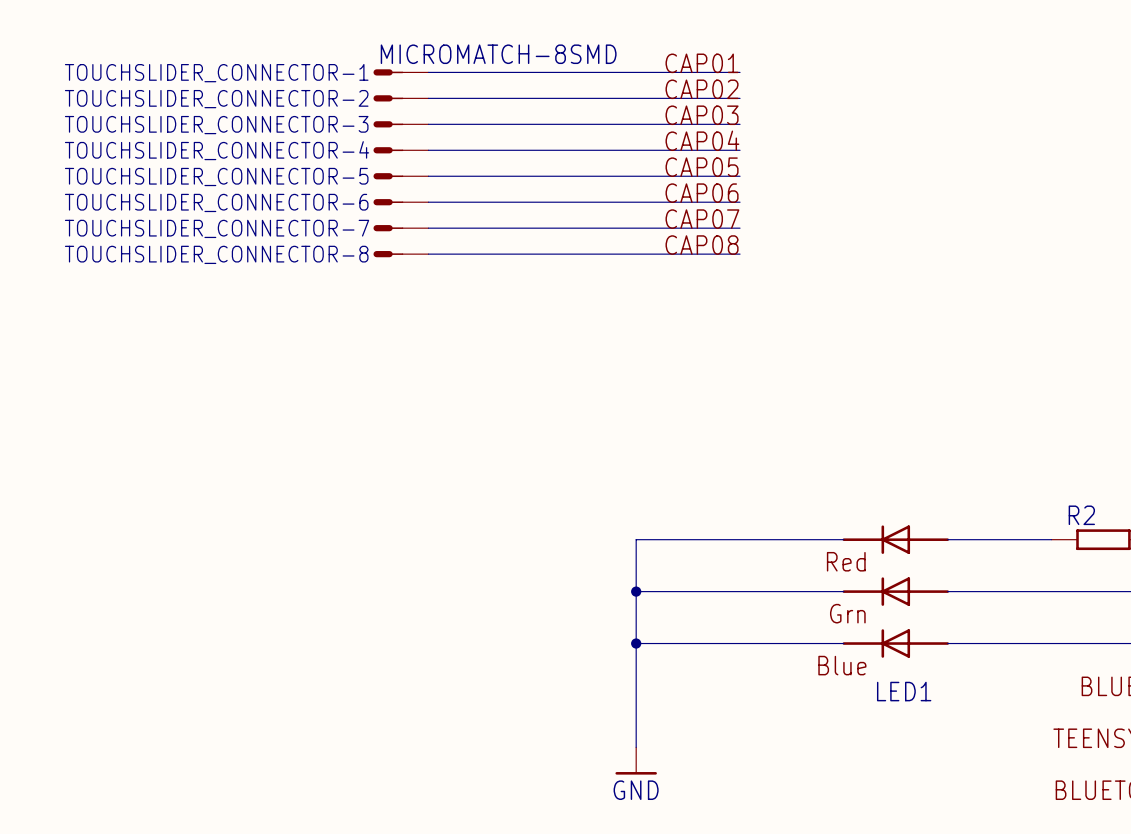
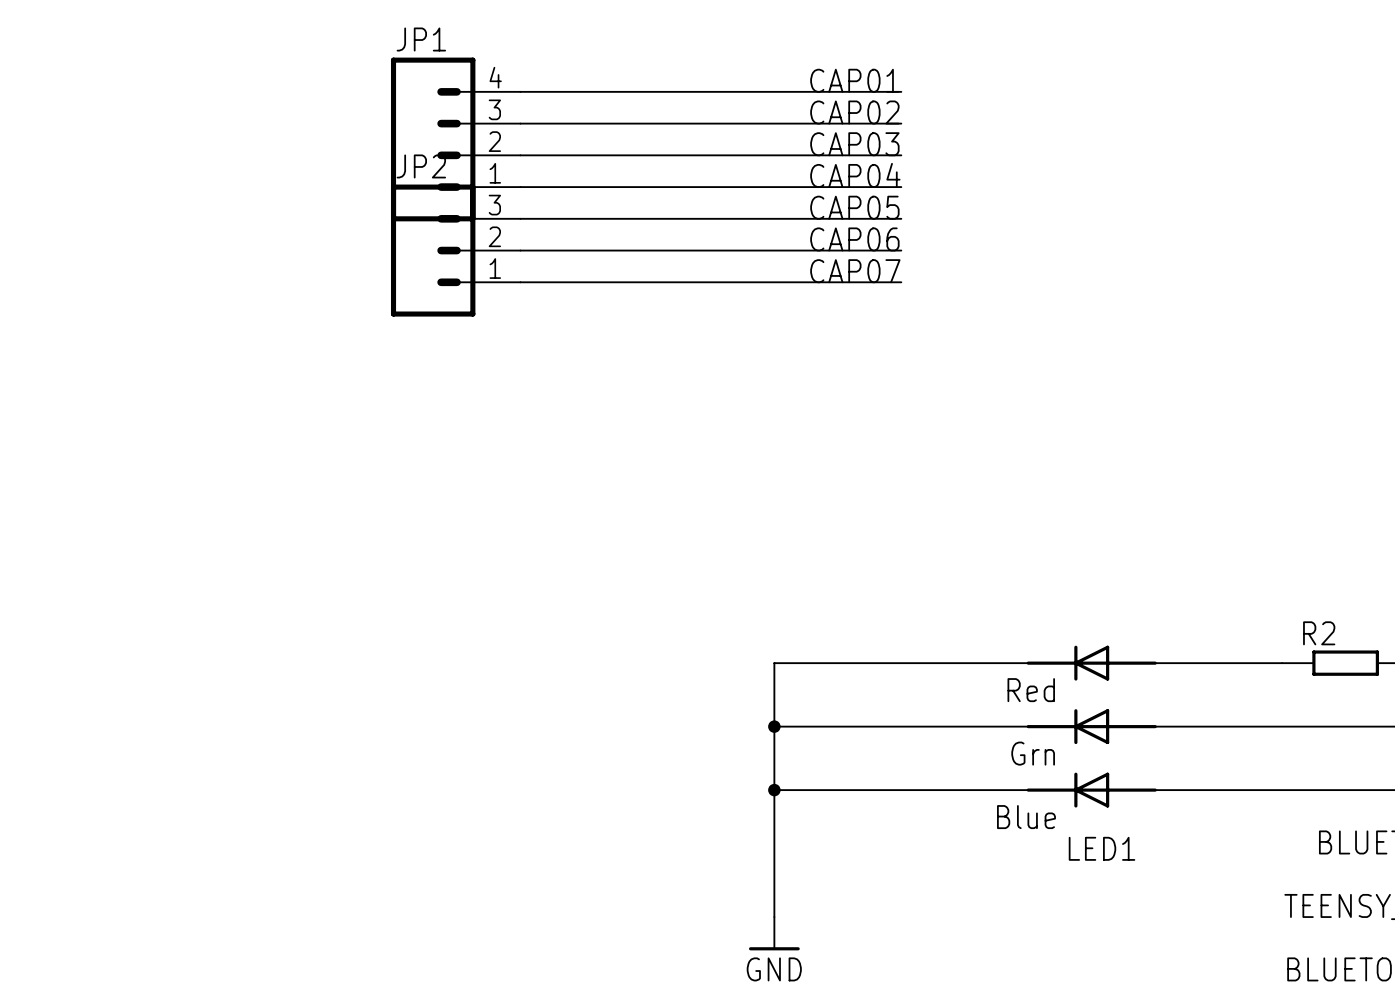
TOUCHSLIDER_CONNECTOR-1: MICROMATCH-8SMD (400, 72) -> none
TOUCHSLIDER_CONNECTOR-2: (400, 98) -> none
JP1: none -> (455, 139)
TOUCHSLIDER_CONNECTOR-3: (400, 124) -> none
TOUCHSLIDER_CONNECTOR-4: (400, 150) -> none
TOUCHSLIDER_CONNECTOR-5: (400, 176) -> none
JP2: none -> (455, 250)
TOUCHSLIDER_CONNECTOR-6: (400, 202) -> none
TOUCHSLIDER_CONNECTOR-7: (400, 228) -> none
label: CAP08 (702, 245) -> none
TOUCHSLIDER_CONNECTOR-8: (400, 254) -> none
wire: (428, 254) (740, 254) -> none

